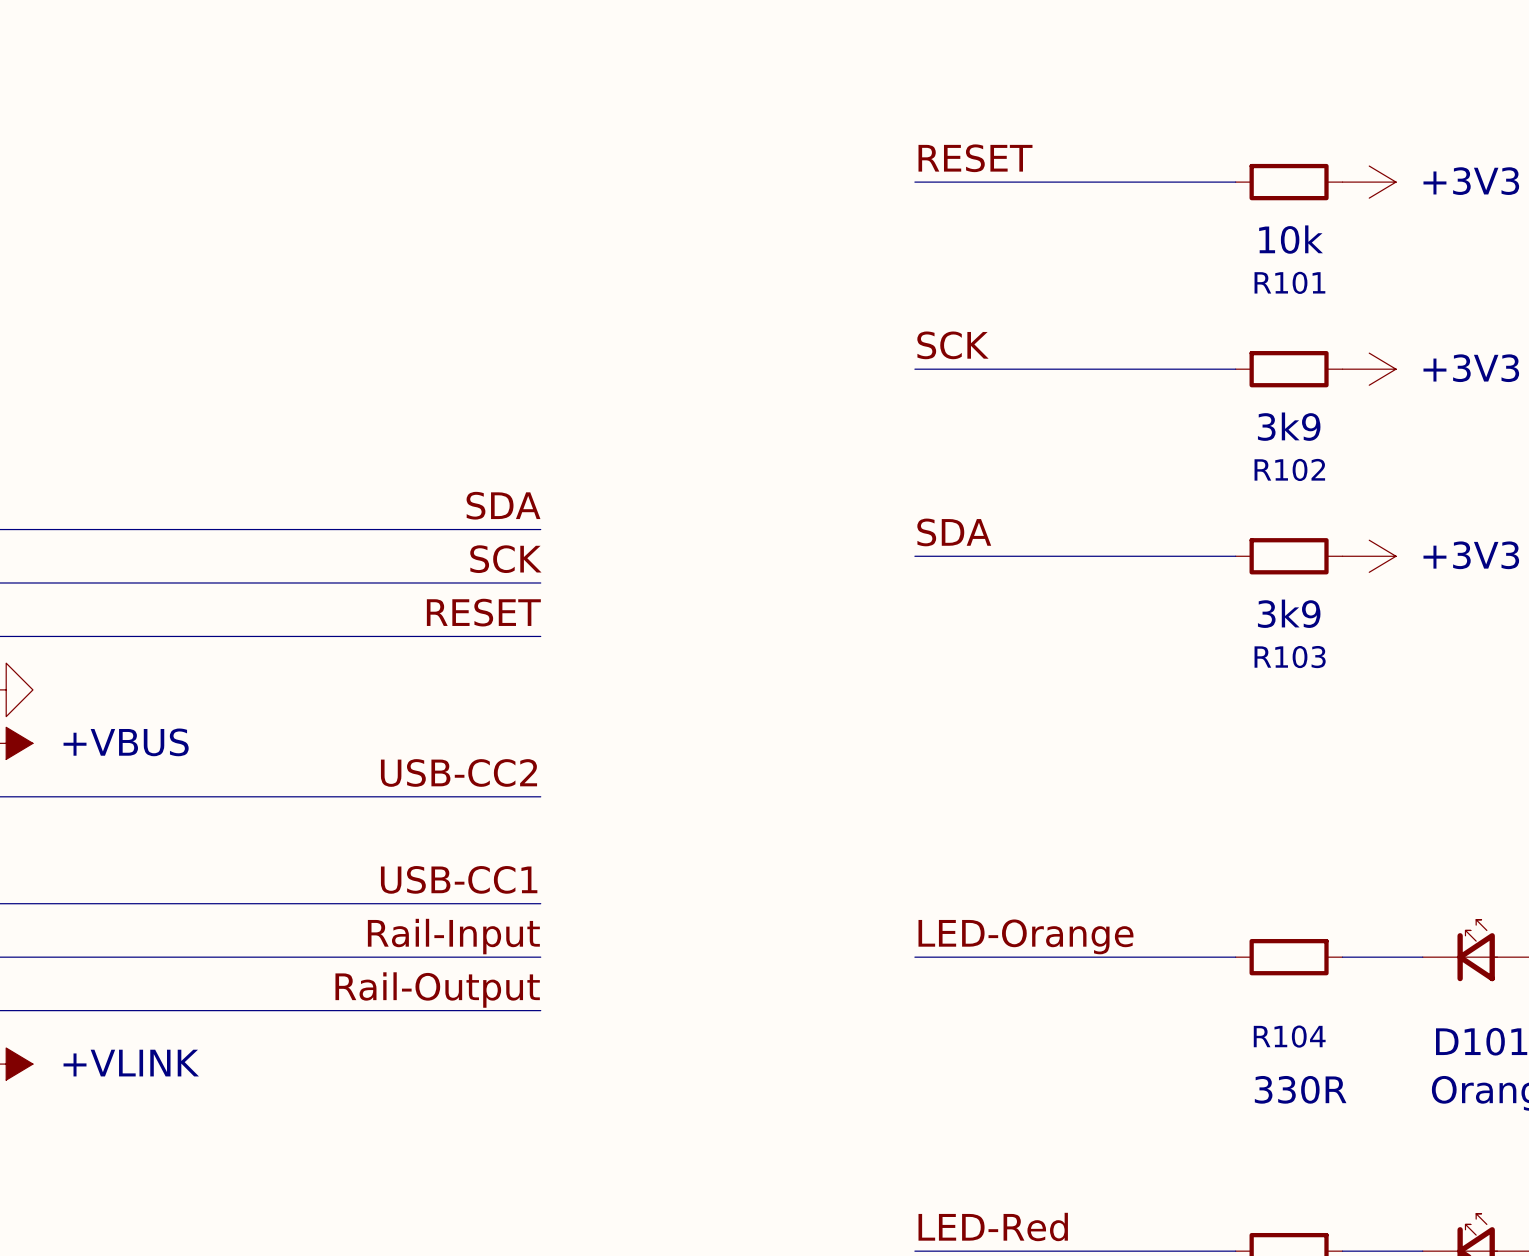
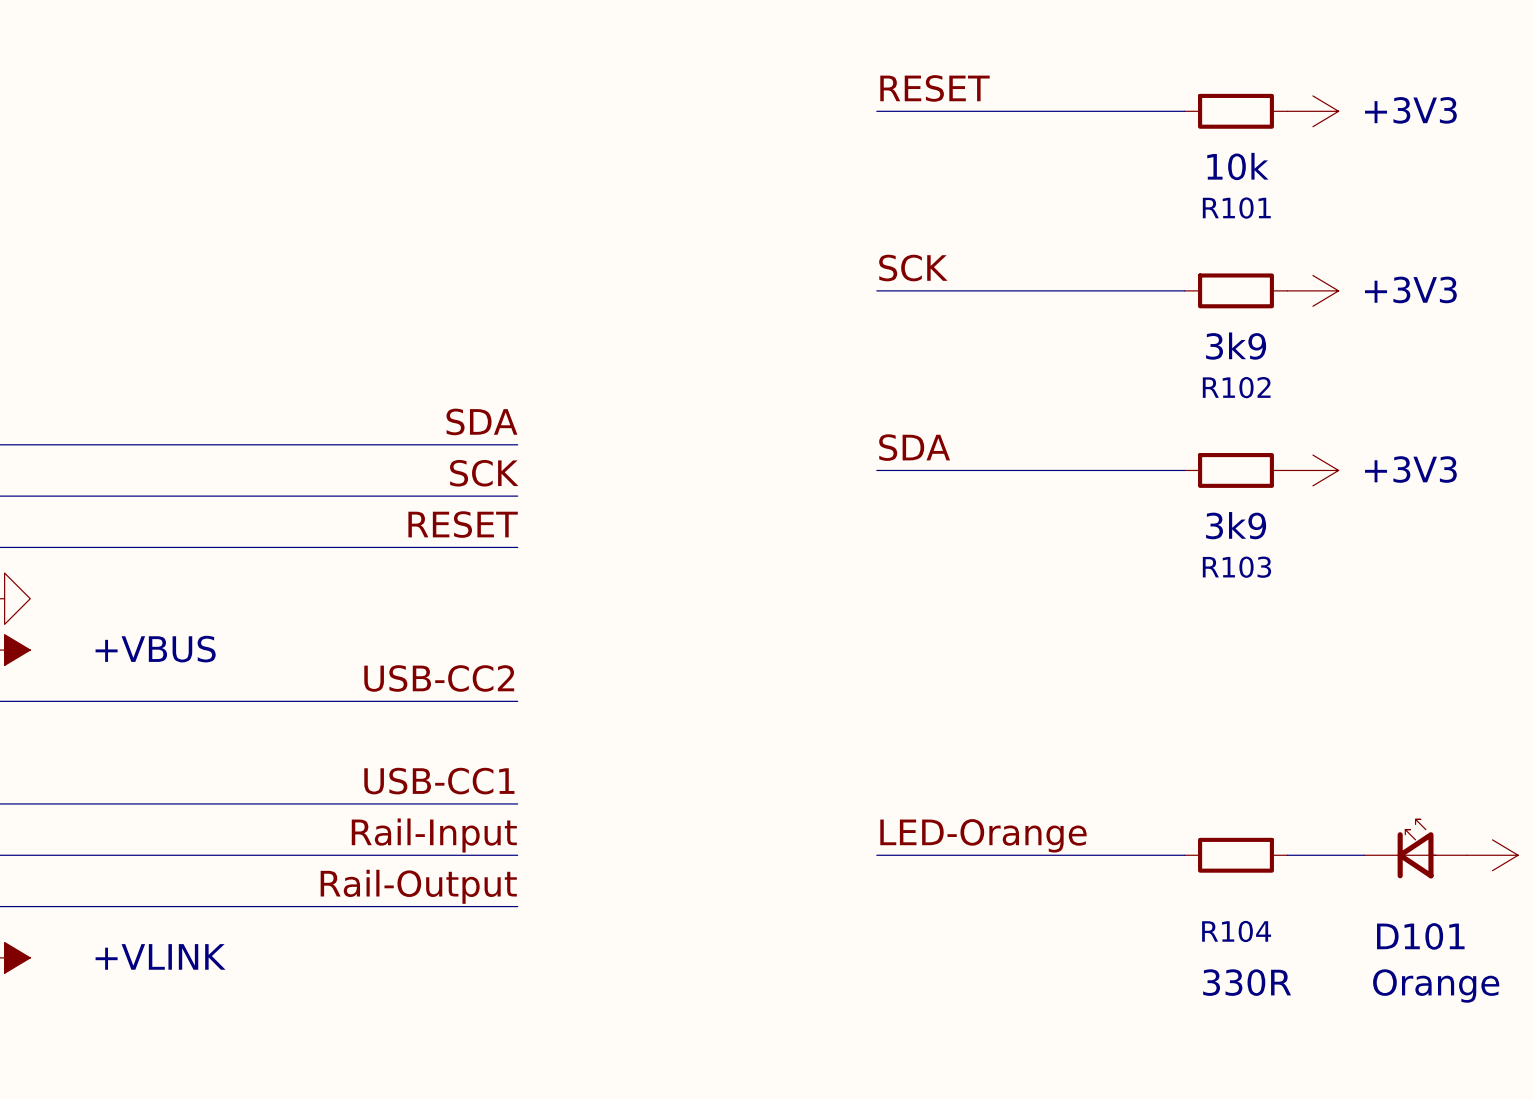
power symbol text position: +VBUS (126, 742) -> +VBUS (155, 649)
power symbol text position: +VLINK (131, 1063) -> +VLINK (160, 956)

